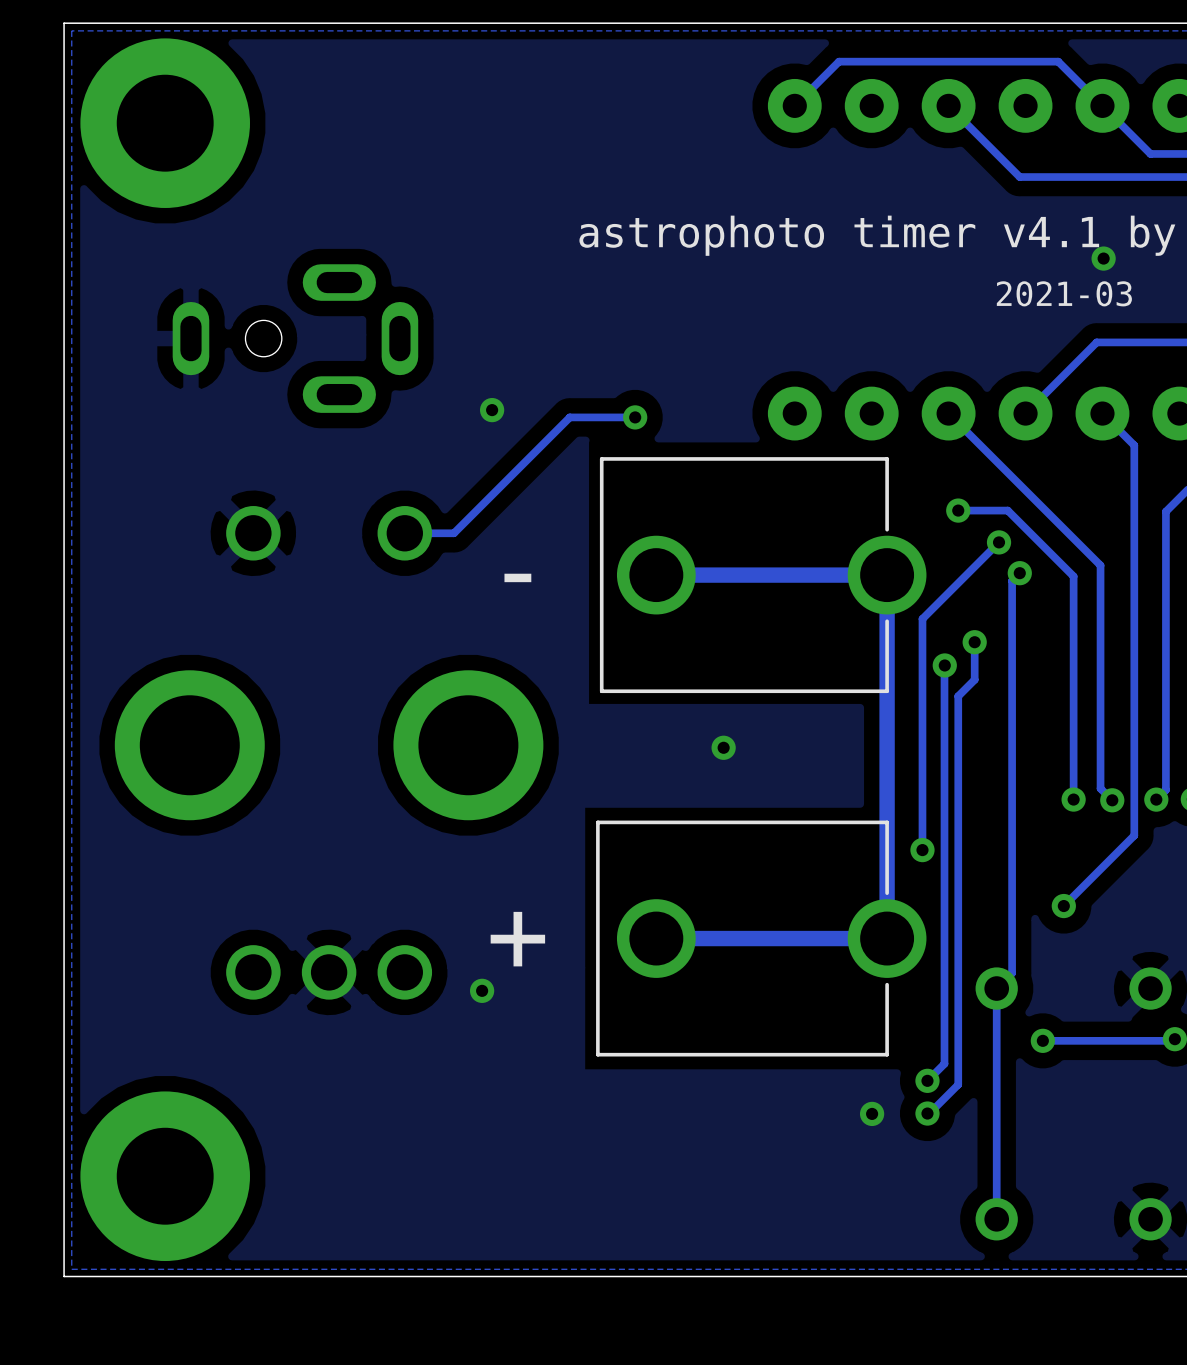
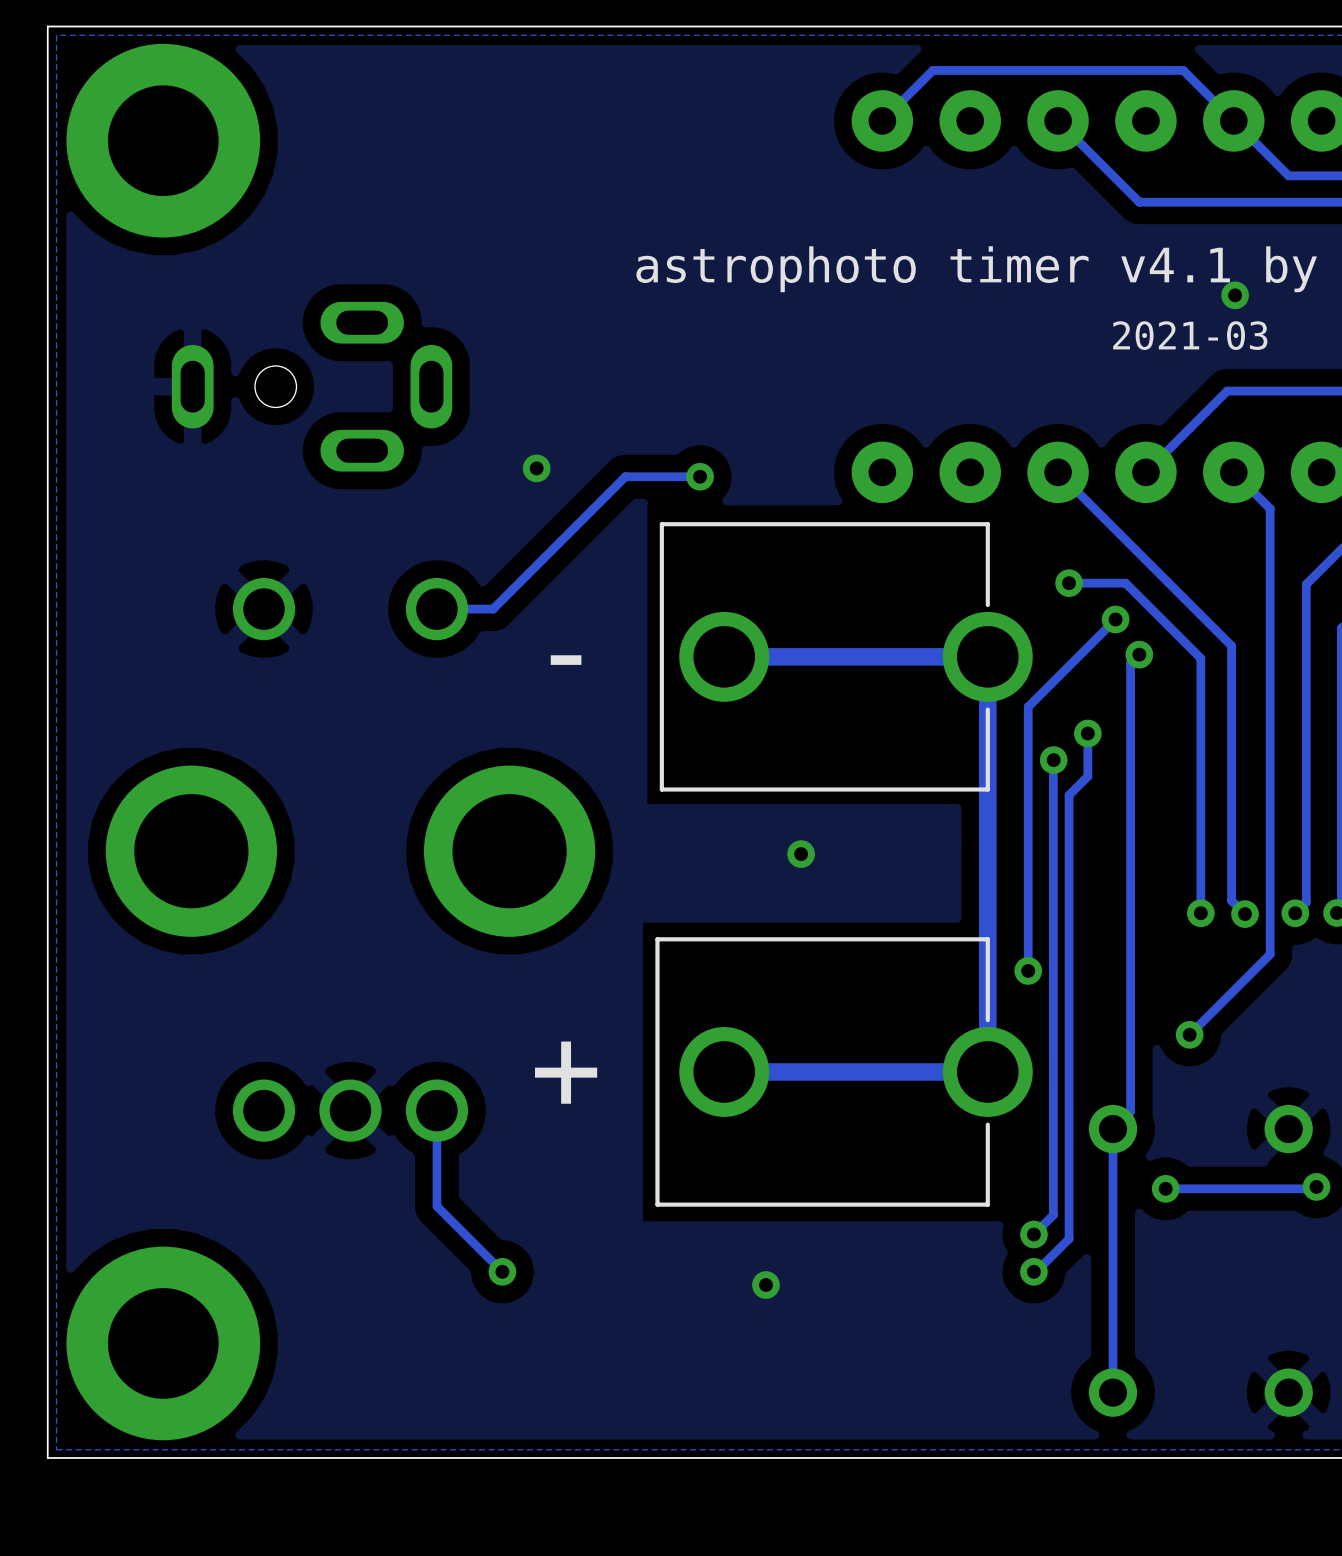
track: none -> (436, 1110) (436, 1206) (502, 1271)
via position: (482, 990) -> (502, 1271)
via: (872, 1113) -> none
via: none -> (765, 1285)

